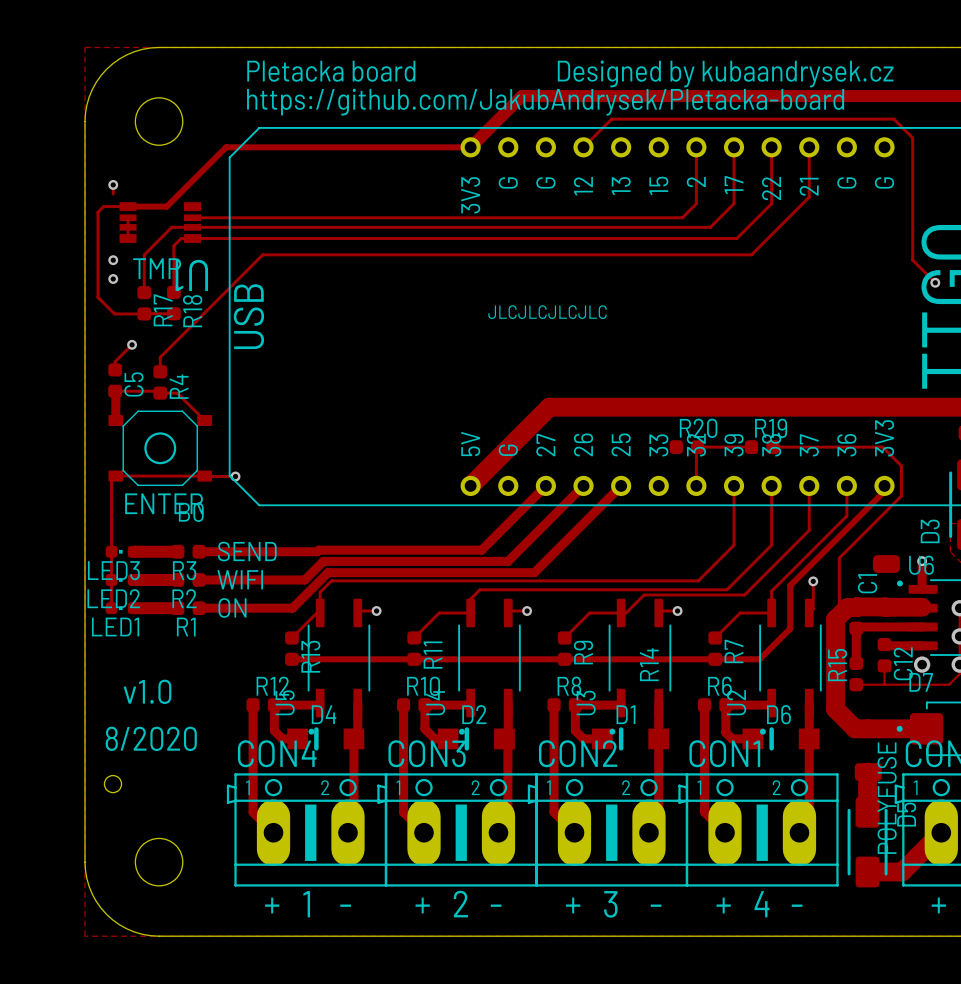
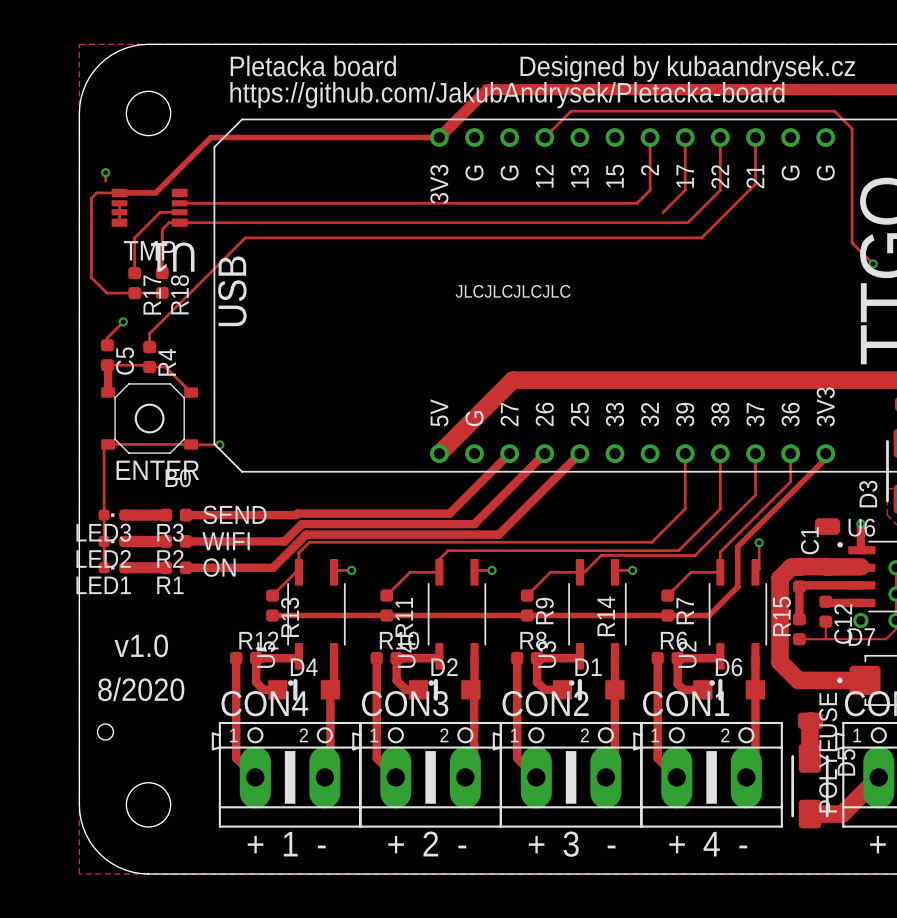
track: (192, 227) (710, 227) -> none
via: (113, 260) -> none
via: (113, 278) -> none
R20: (686, 447) -> none
track: (751, 447) (697, 447) (696, 485) -> none
R19: (762, 447) -> none
track: (772, 447) (882, 447) (901, 465) (901, 496) (839, 558) (839, 615) (835, 619) -> none

